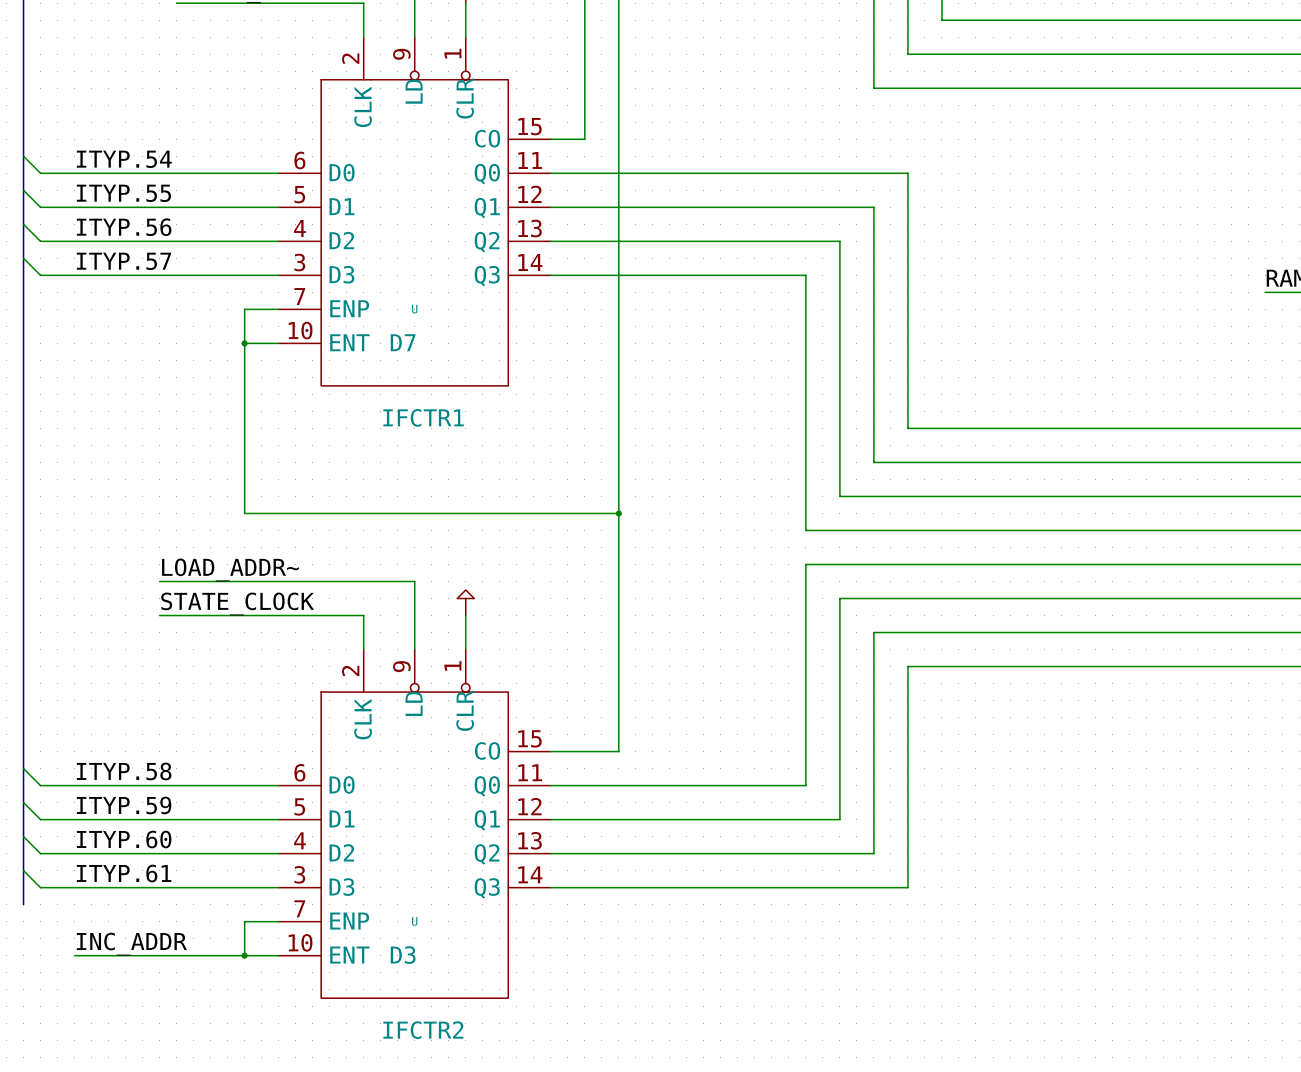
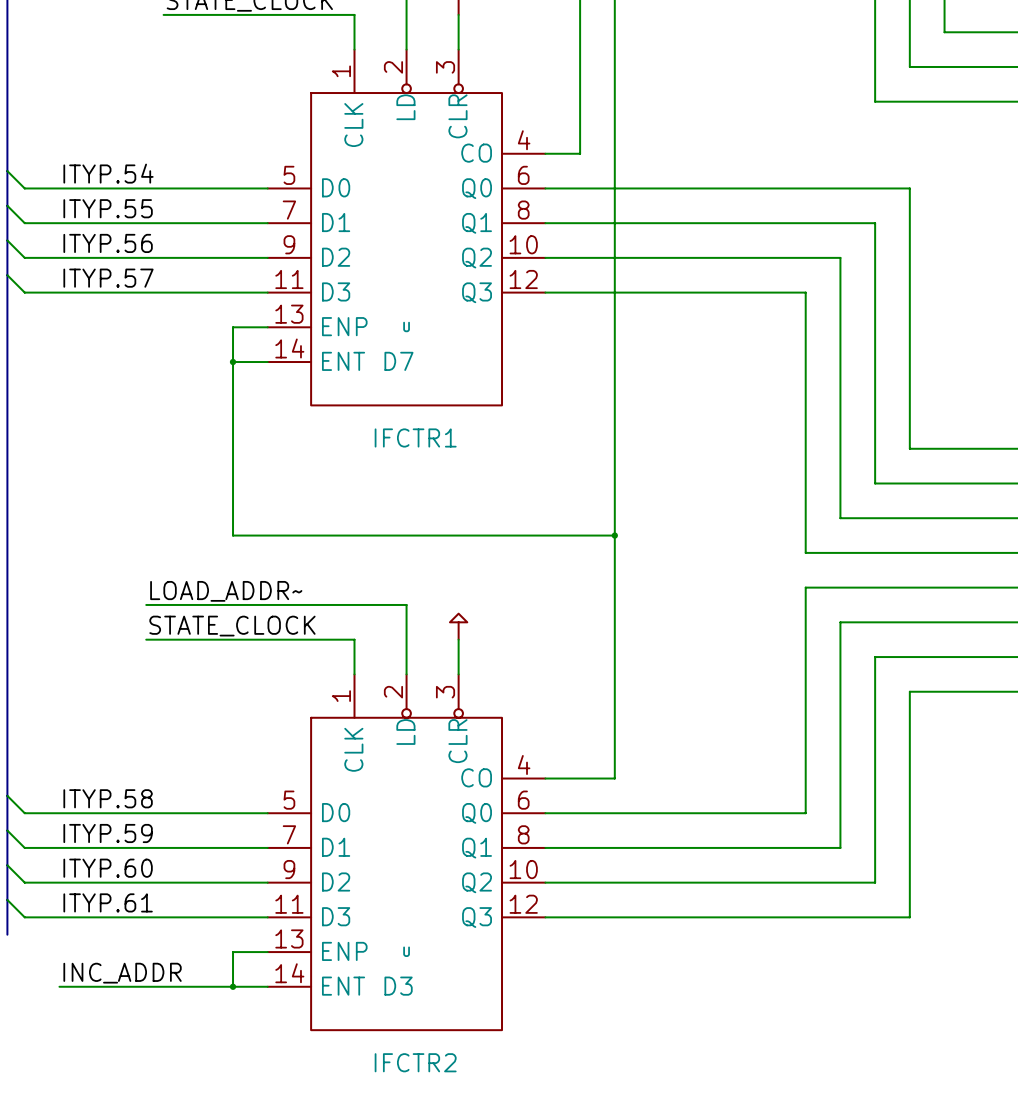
U symbol: [278, 37, 551, 386] -> [267, 49, 546, 406]
U symbol: [278, 649, 551, 999] -> [267, 674, 546, 1031]

